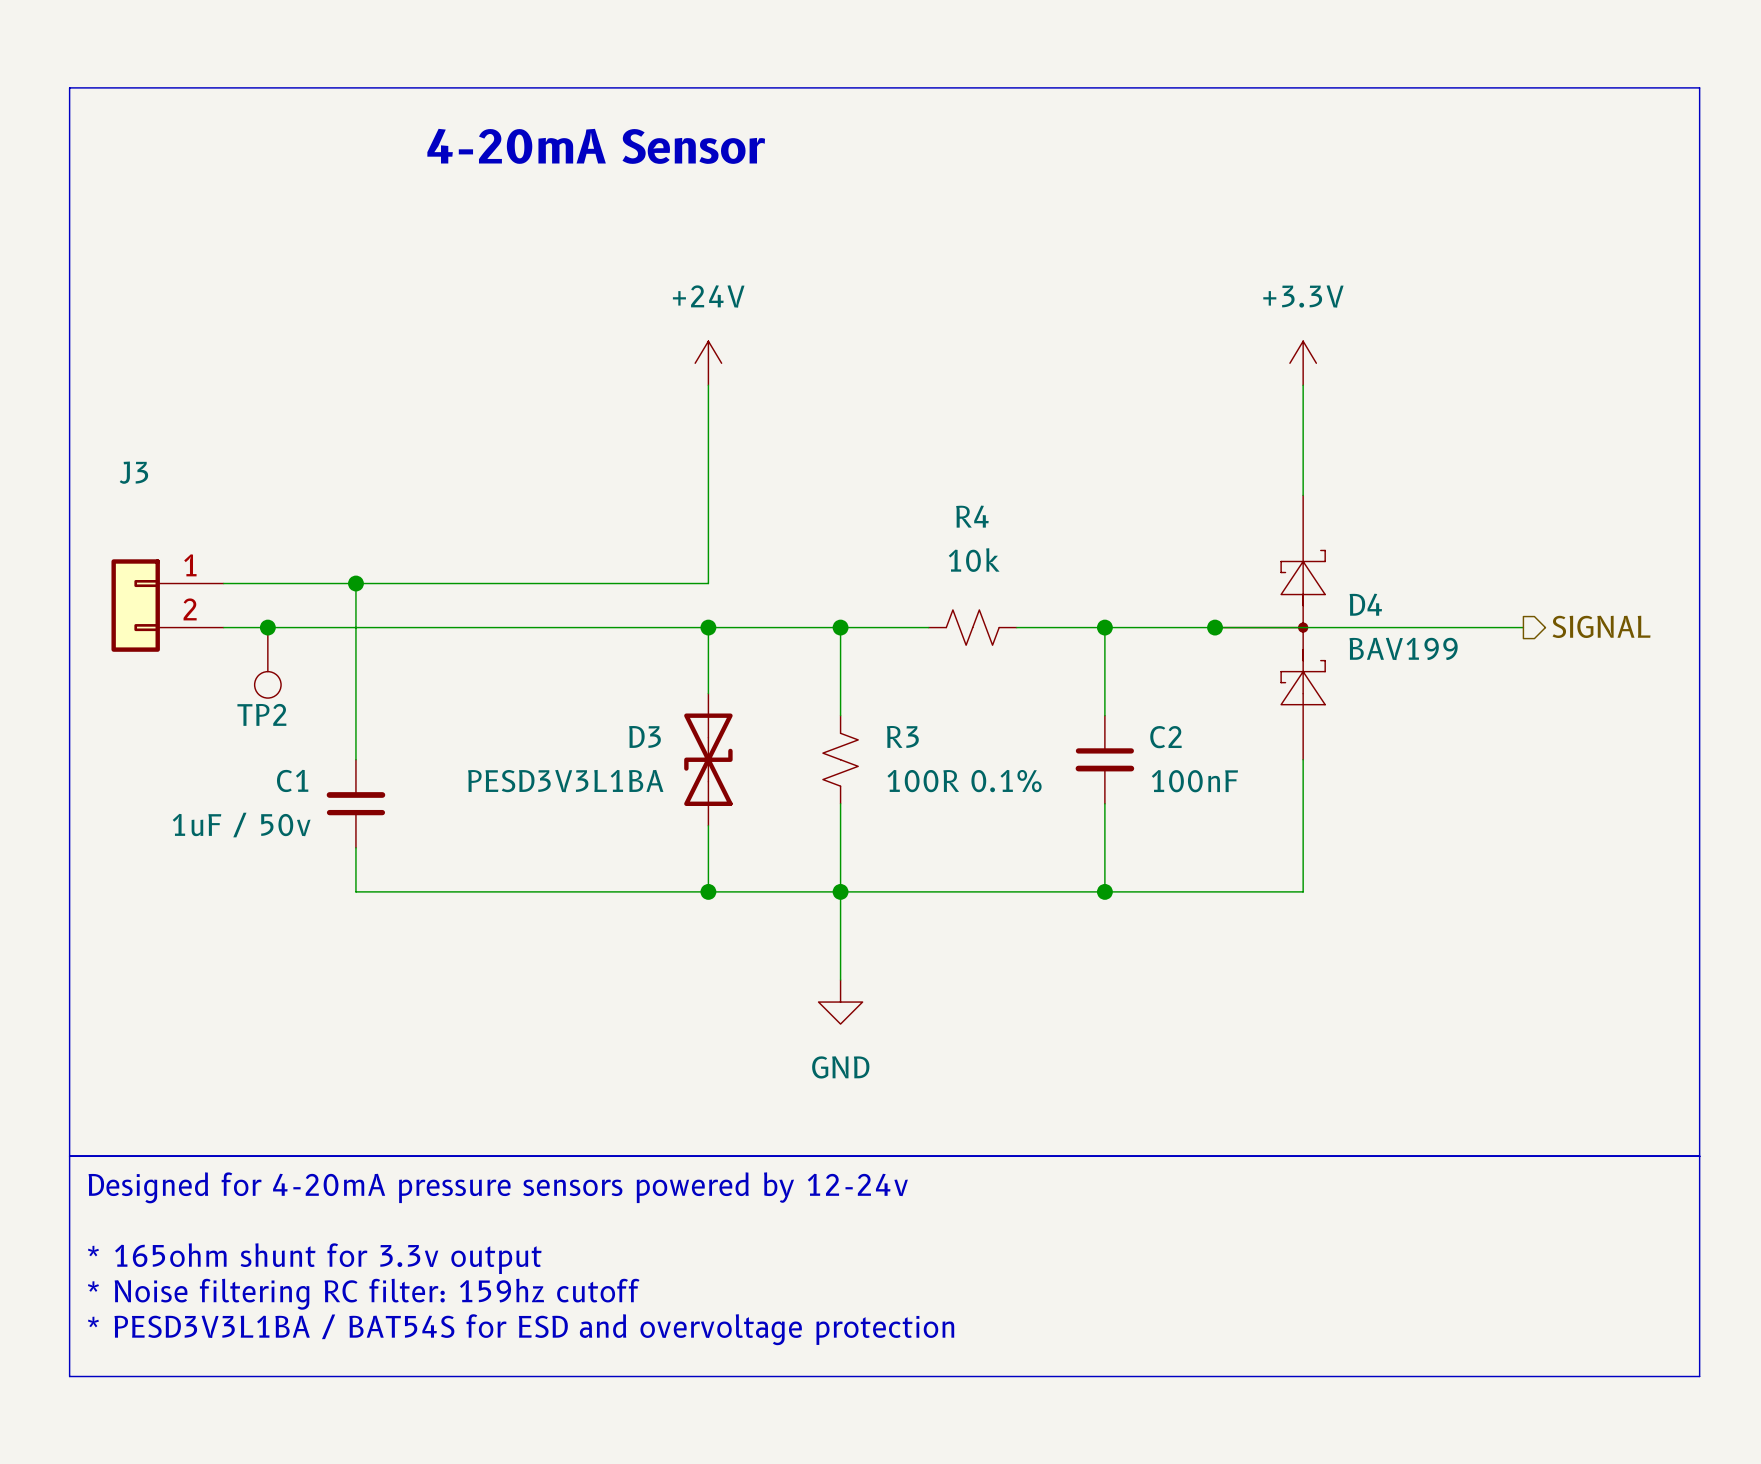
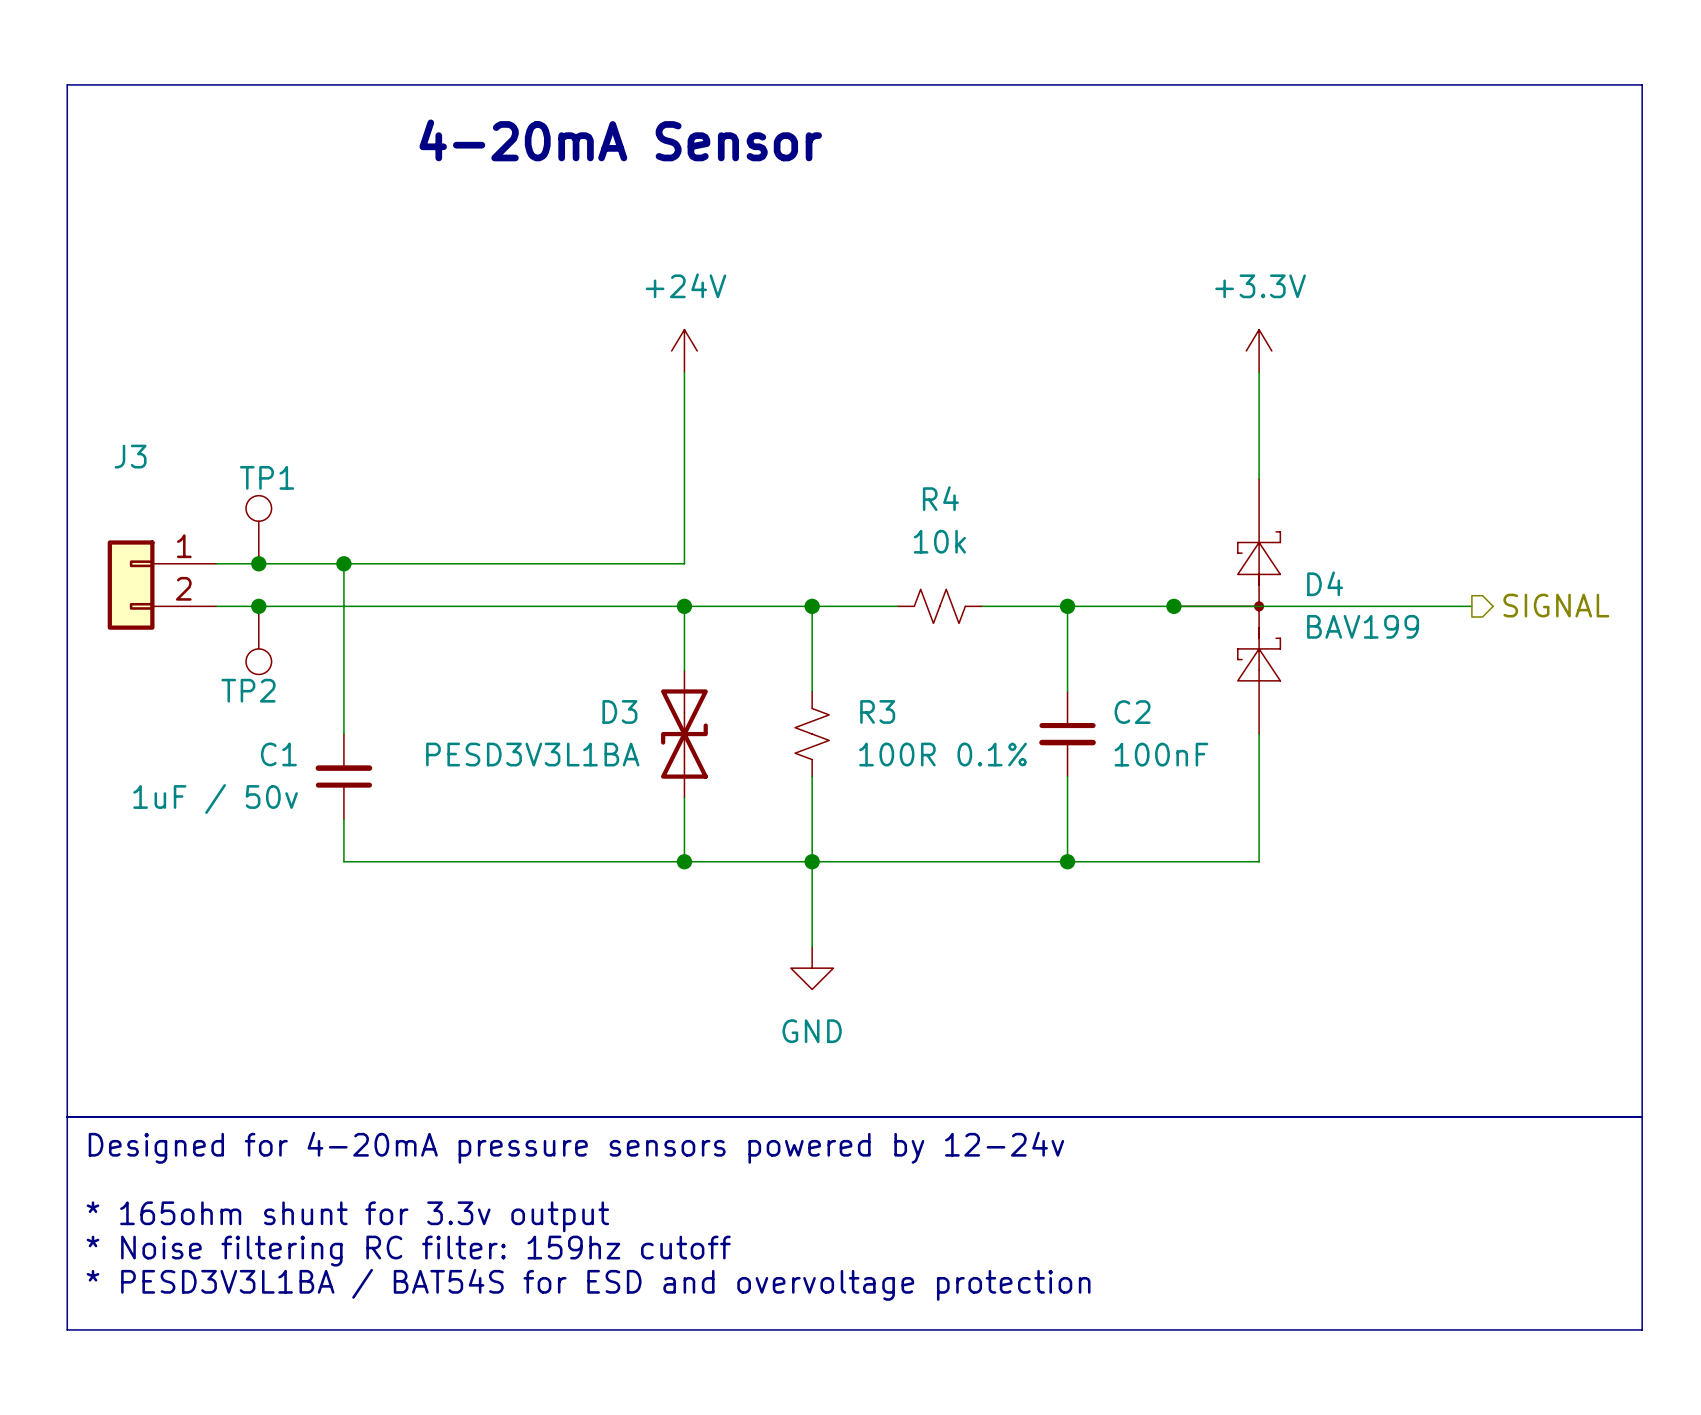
TP1: none -> (258, 529)
junction: none -> (258, 563)

